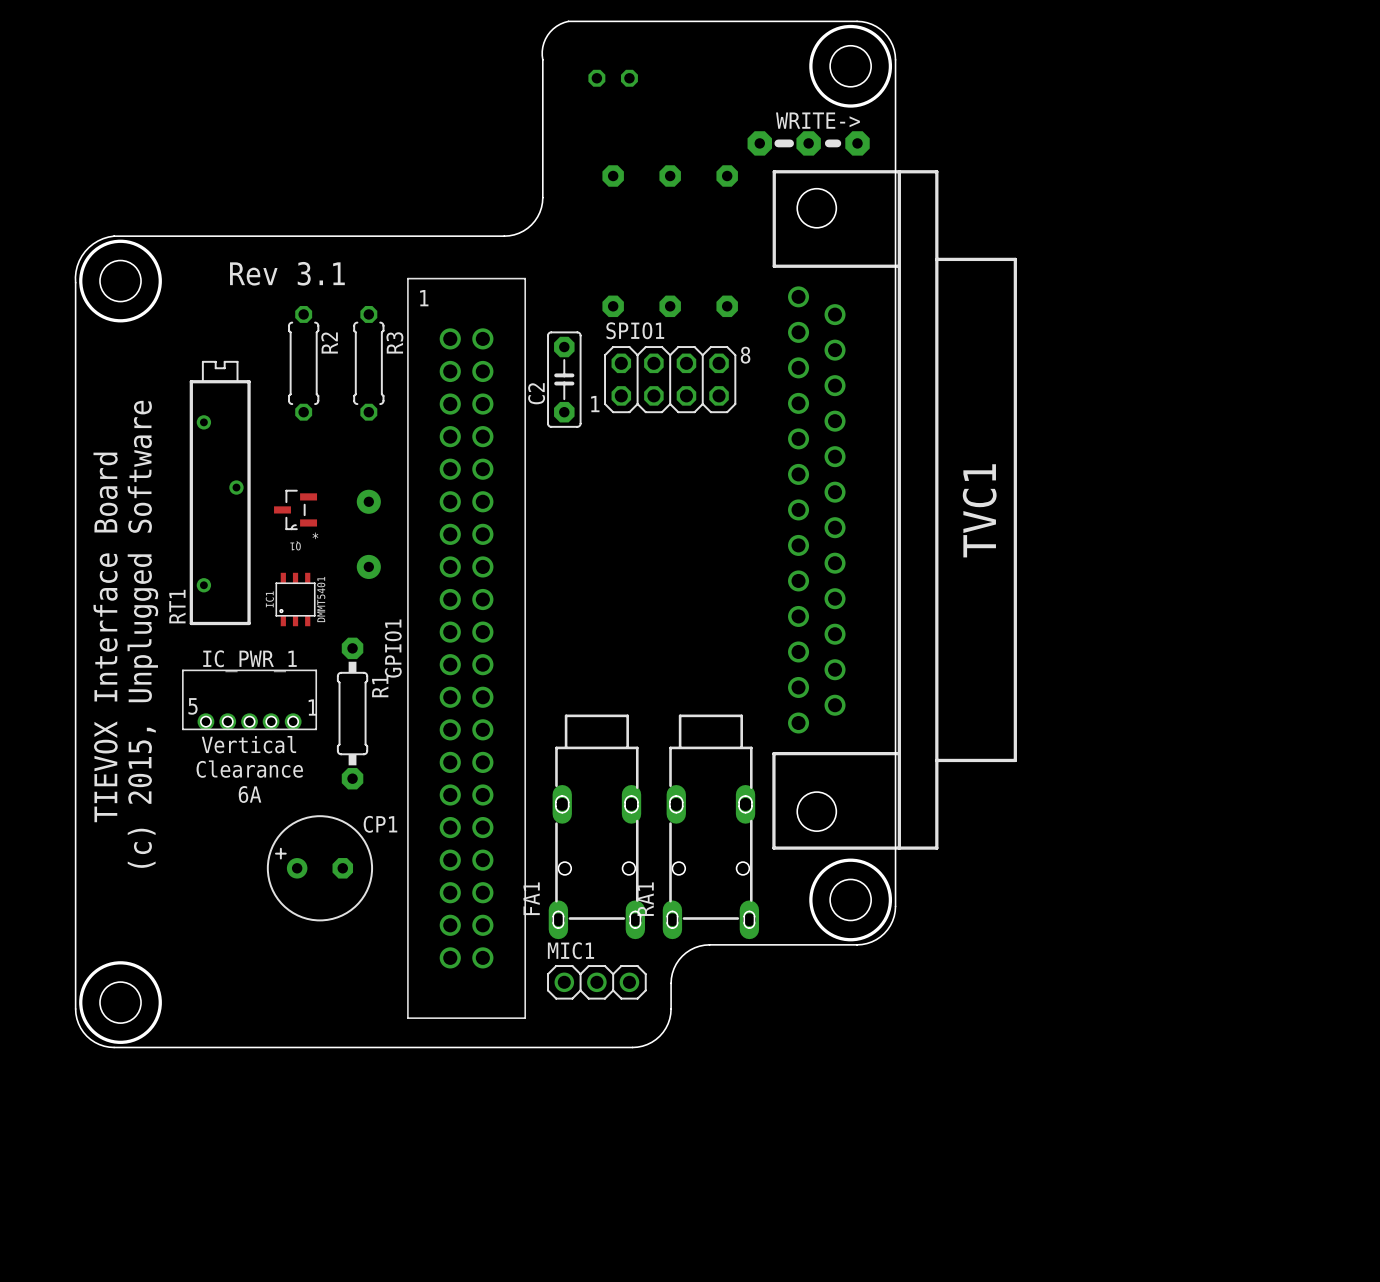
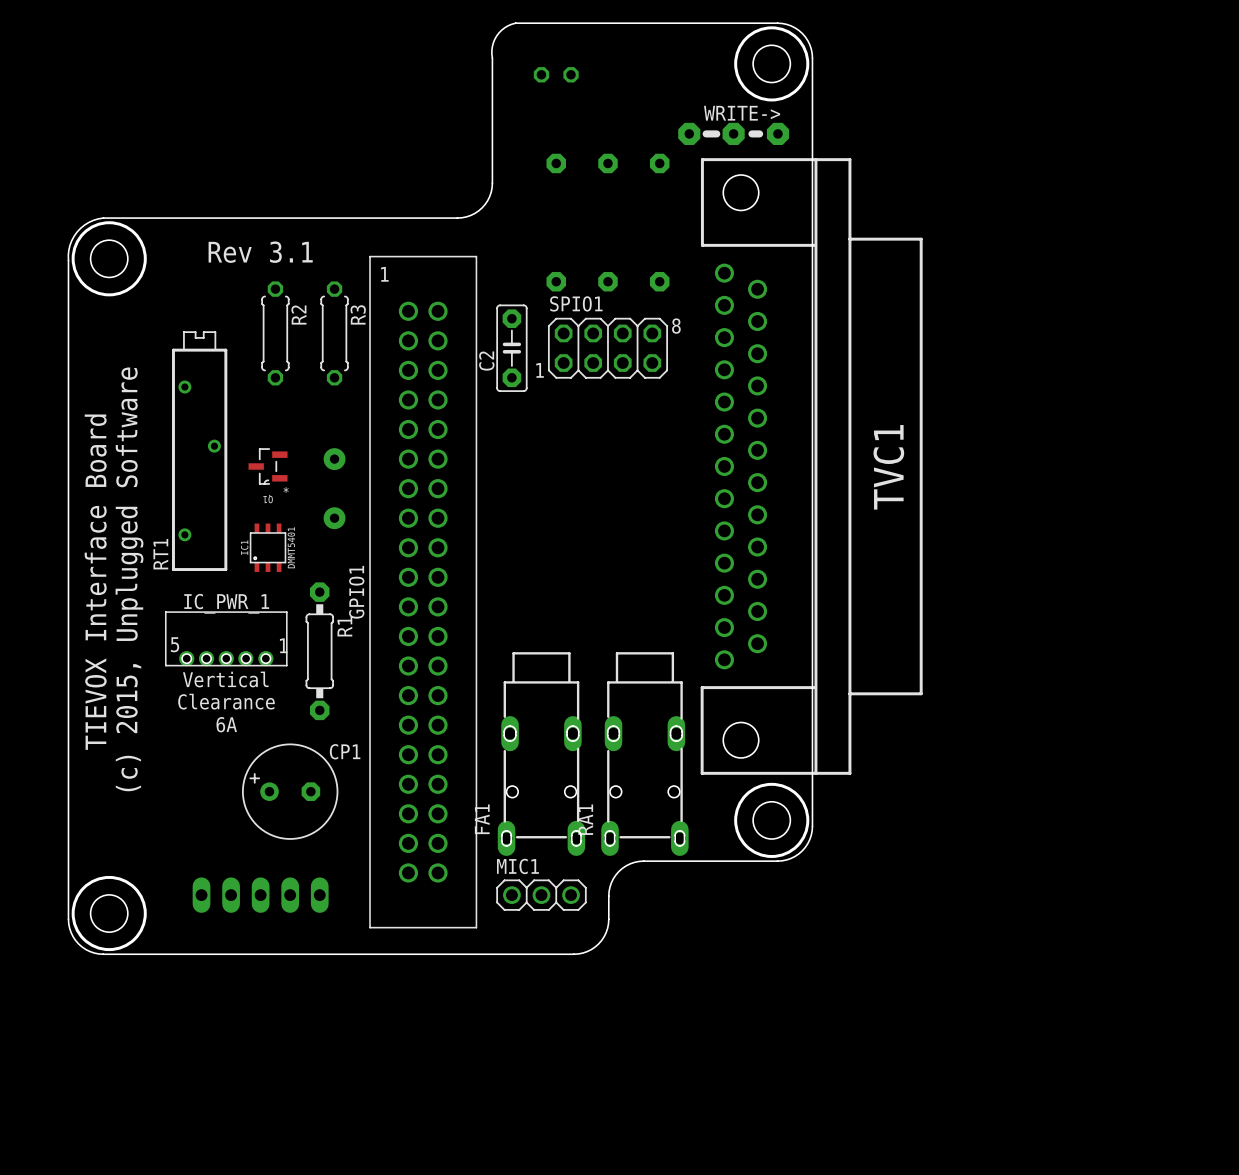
part: none -> (260, 895)

